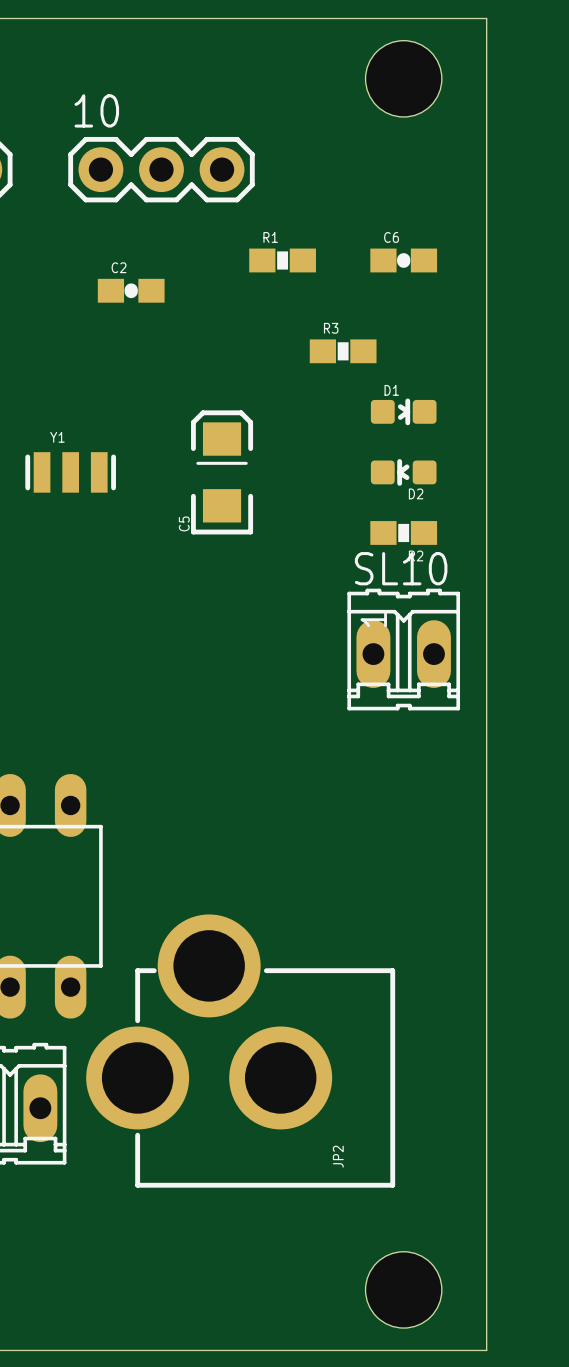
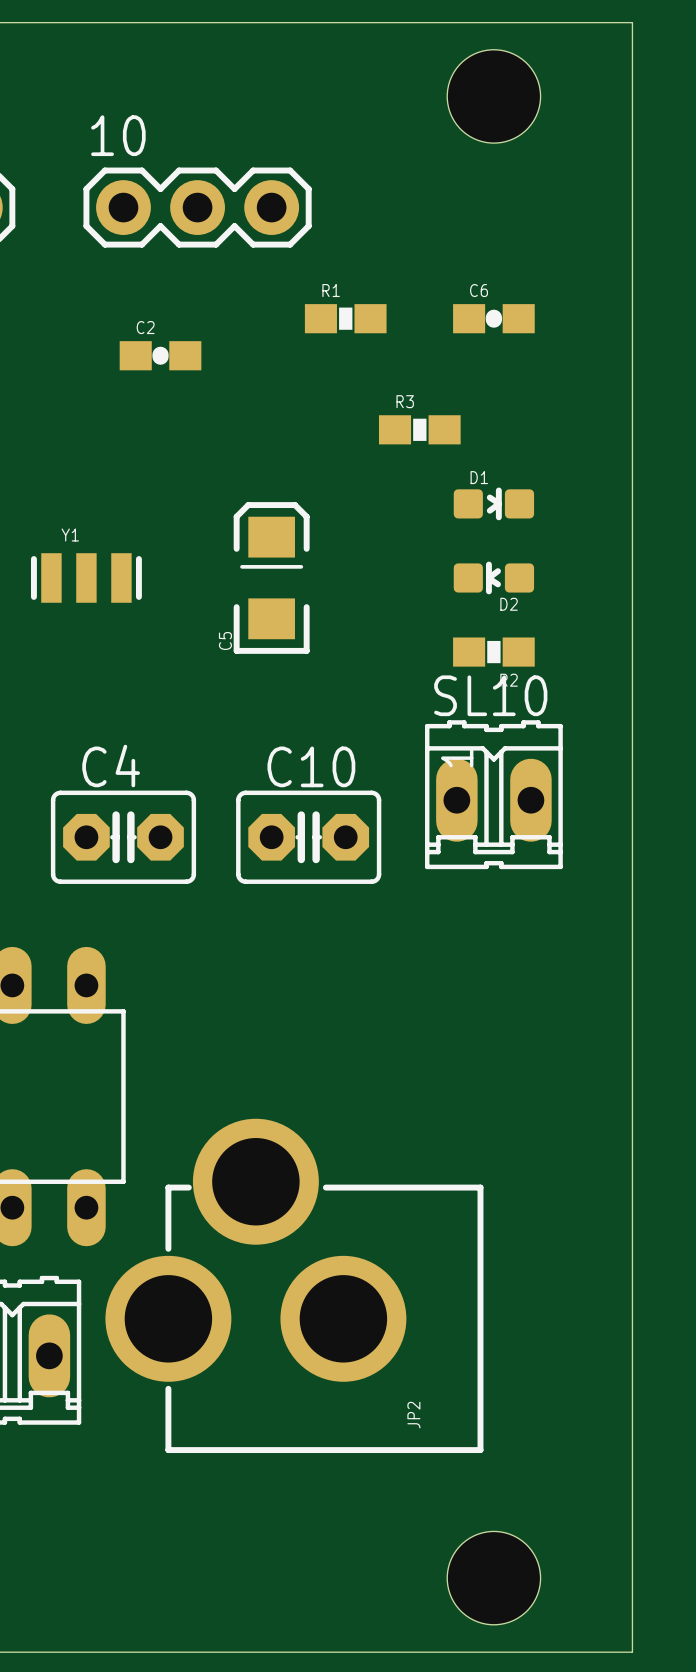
board edge: (486, 18) (486, 1350) -> (595, 22) (632, 22) (632, 1652) (595, 1652)
C4: none -> (123, 837)
C10: none -> (308, 837)

